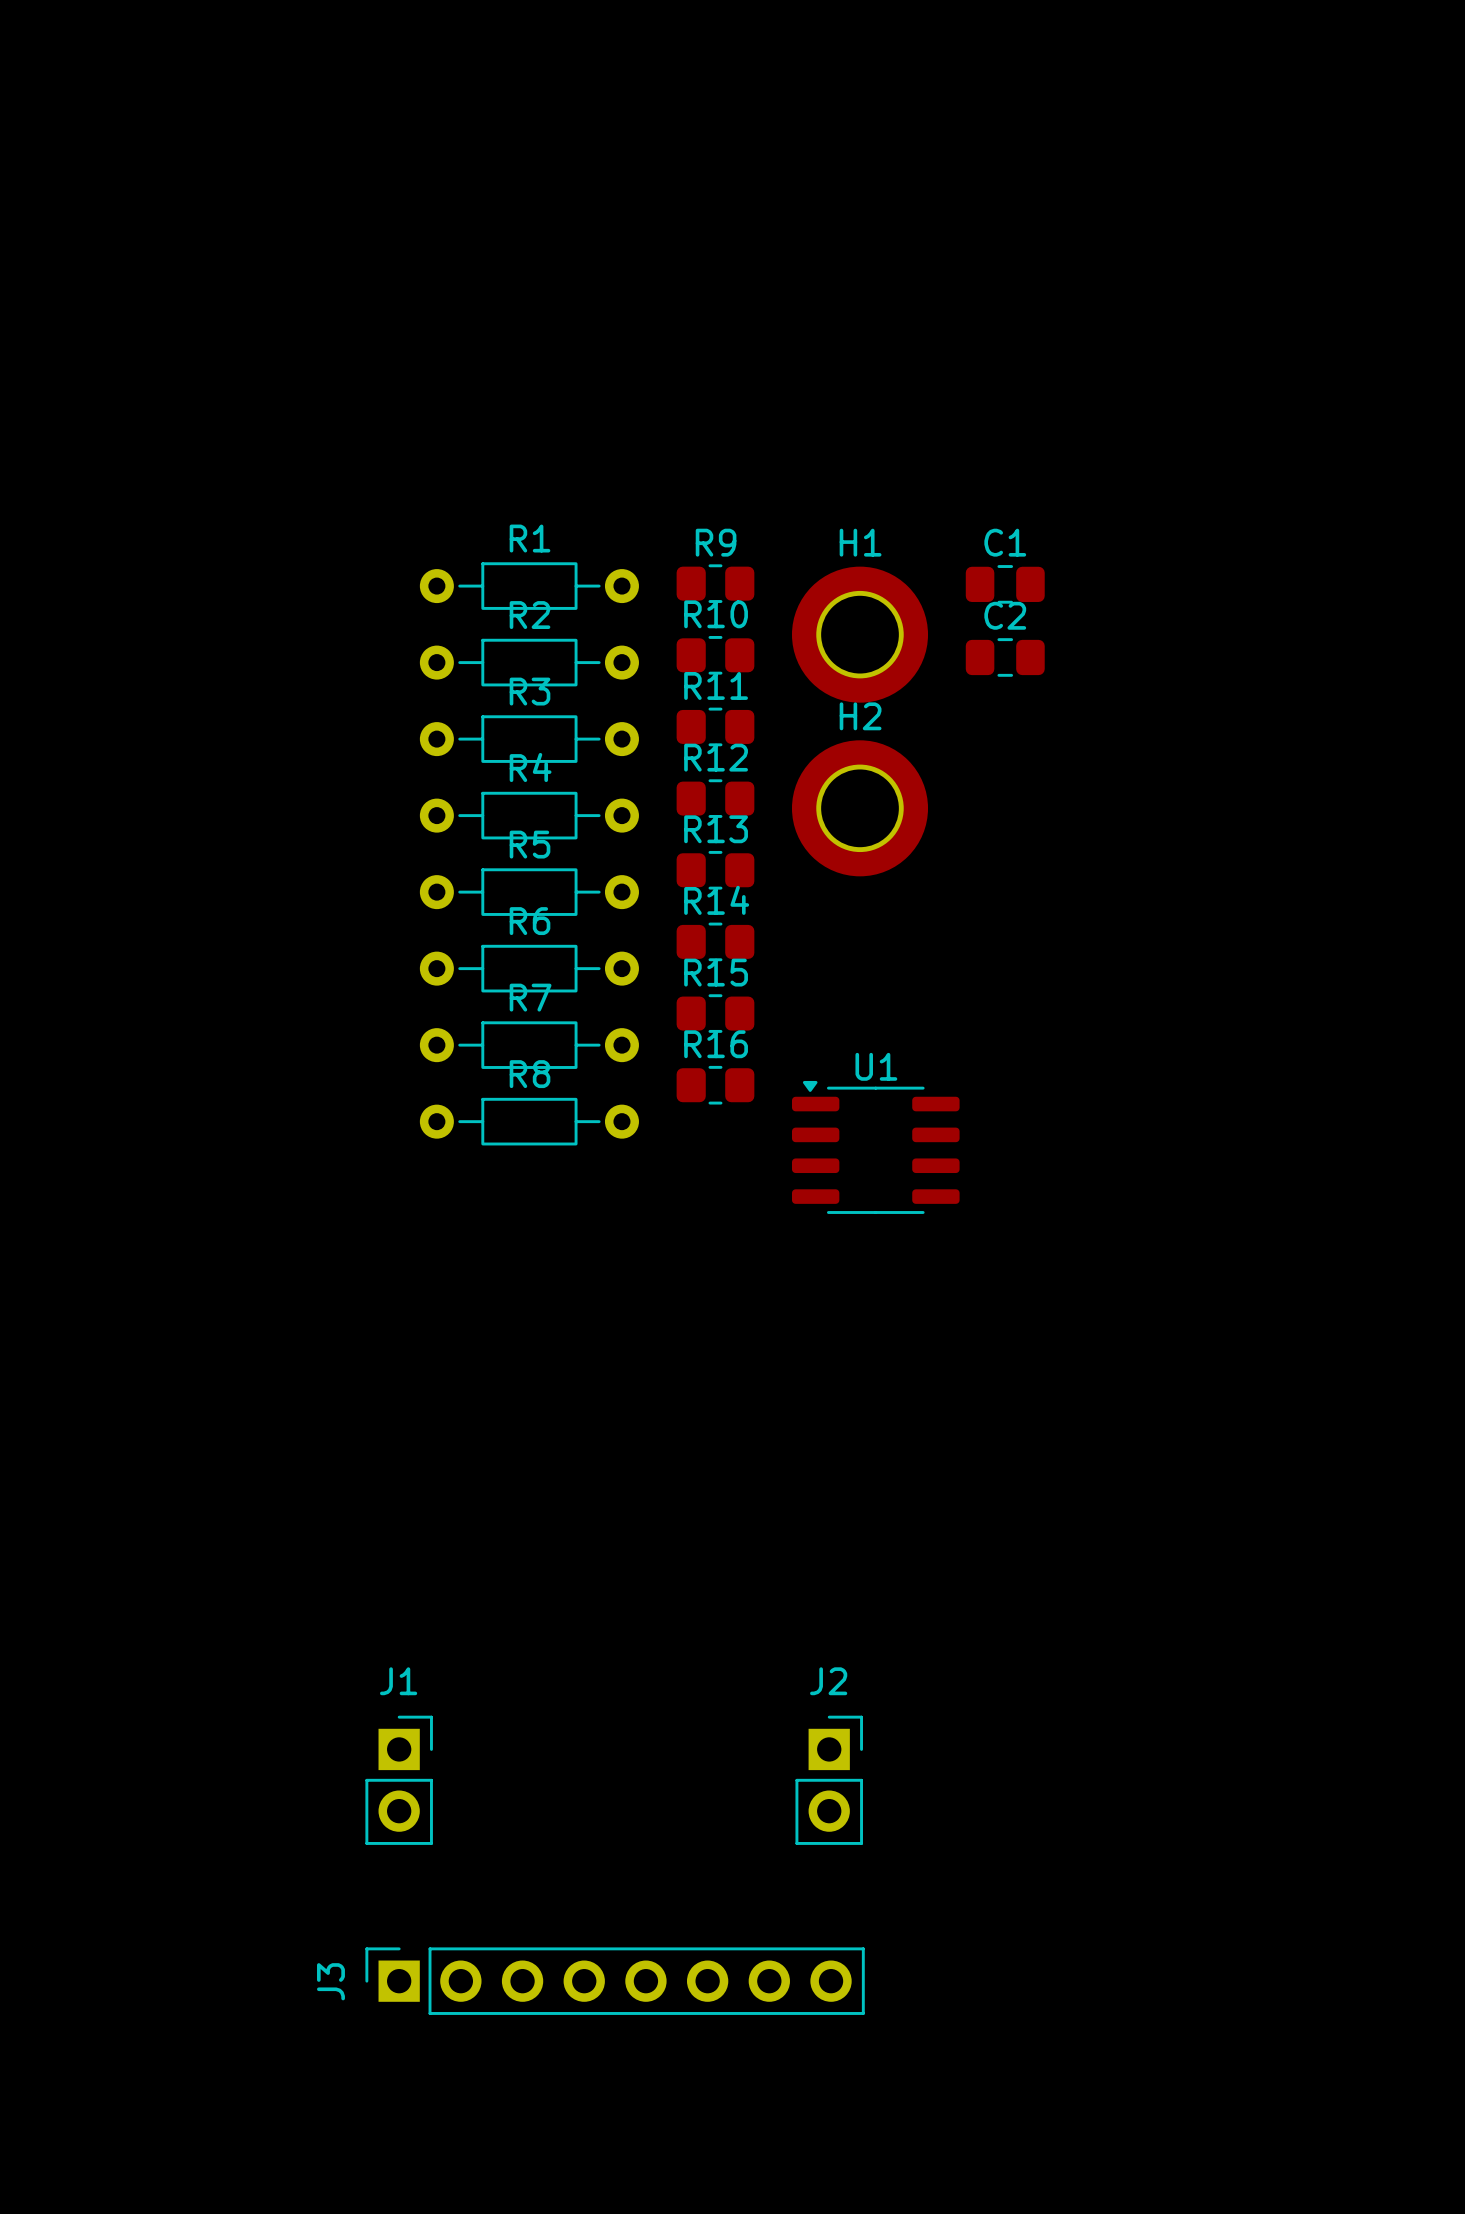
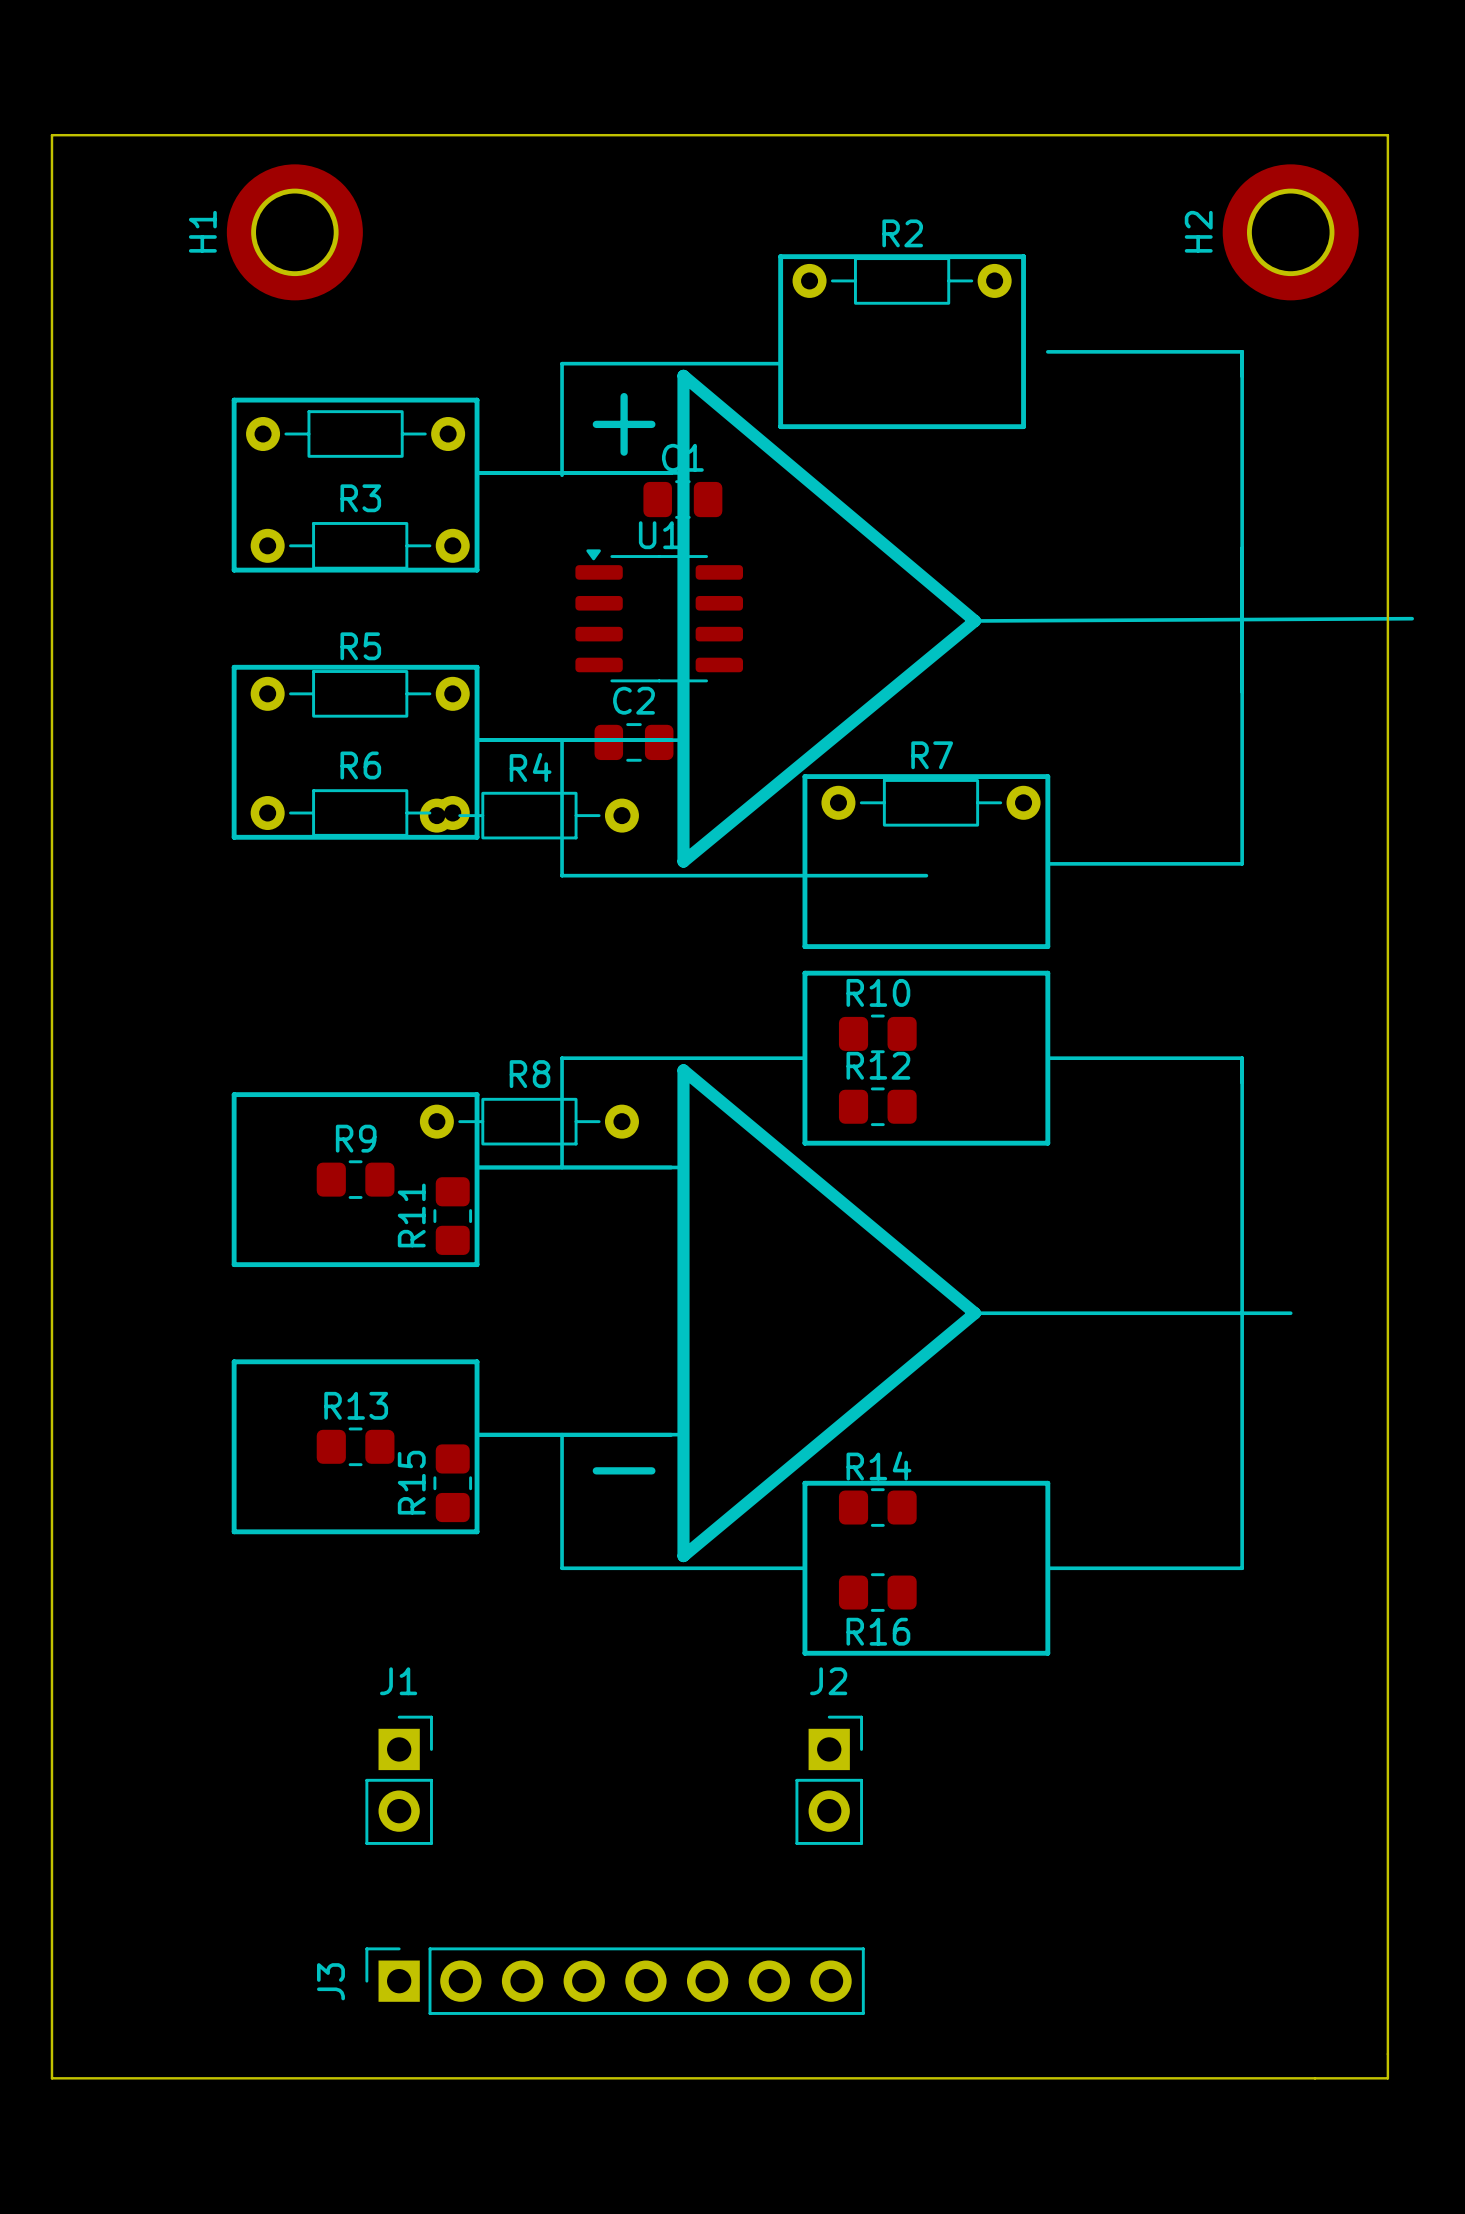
board edge: none -> (51, 135) (1387, 135) (1387, 2078) (51, 2078) (51, 135)
line: none -> (780, 256) (1023, 256) (1023, 426) (780, 426) (780, 256)
line: none -> (1047, 351) (1242, 351) (1242, 863) (1047, 863)
line: none -> (780, 363) (562, 363) (562, 475)
line: none -> (234, 400) (477, 400) (477, 570) (234, 570) (234, 400)
text: none -> + (624, 424)
part: none -> (355, 434)
line: none -> (477, 472) (682, 472)
H1 name rotation: 0° (860, 542) -> 90° counterclockwise (202, 231)
H1 name position: H1 (860, 542) -> H1 (202, 231)
R9 position: (715, 583) -> (355, 1179)
C1 position: (1005, 584) -> (682, 499)
R1: (529, 586) -> none
line: none -> (1412, 618) (974, 620)
line: none -> (974, 620) (683, 861) (683, 375) (974, 620)
H1 position: (860, 634) -> (294, 232)
R10 position: (715, 655) -> (877, 1033)
C2 position: (1005, 657) -> (634, 742)
R2 position: (529, 662) -> (902, 280)
line: none -> (234, 667) (234, 837) (477, 837) (477, 667) (234, 667)
R11 name position: R11 (716, 685) -> R11 (411, 1215)
H2 name rotation: 0° (860, 716) -> 90° counterclockwise (1198, 231)
H2 name position: H2 (860, 716) -> H2 (1198, 231)
R11 rotation: 0° (715, 726) -> 90° clockwise (452, 1216)
R11 position: (715, 726) -> (452, 1216)
R3 position: (529, 739) -> (360, 545)
line: none -> (477, 740) (683, 740)
line: none -> (562, 740) (562, 875) (926, 875)
line: none -> (804, 776) (804, 946) (1047, 946) (1047, 776) (804, 776)
R12 position: (715, 798) -> (877, 1106)
H2 position: (860, 808) -> (1290, 232)
R13 position: (715, 870) -> (355, 1446)
R5 position: (529, 892) -> (360, 693)
R14 position: (715, 941) -> (877, 1507)
R6 position: (529, 968) -> (360, 813)
R15 name position: R15 (716, 972) -> R15 (411, 1482)
line: none -> (804, 973) (804, 1143) (1047, 1143) (1047, 973) (804, 973)
R15 rotation: 0° (715, 1013) -> 90° clockwise (452, 1483)
R15 position: (715, 1013) -> (452, 1483)
R16 name position: R16 (716, 1044) -> R16 (878, 1631)
R7 position: (529, 1045) -> (931, 802)
line: none -> (804, 1058) (562, 1058) (562, 1167)
line: none -> (1047, 1058) (1242, 1058) (1242, 1568) (1047, 1568)
R16 position: (715, 1085) -> (877, 1592)
line: none -> (234, 1094) (234, 1264) (477, 1264) (477, 1094) (234, 1094)
U1 position: (875, 1147) -> (659, 615)
line: none -> (477, 1167) (683, 1167)
line: none -> (974, 1313) (1290, 1313)
line: none -> (974, 1313) (683, 1556) (683, 1070) (974, 1313)
line: none -> (234, 1361) (234, 1531) (477, 1531) (477, 1361) (234, 1361)
line: none -> (477, 1434) (683, 1434)
line: none -> (562, 1434) (562, 1568) (804, 1568)
text: none -> - (624, 1470)
line: none -> (804, 1483) (1047, 1483) (1047, 1653) (804, 1653) (804, 1483)

